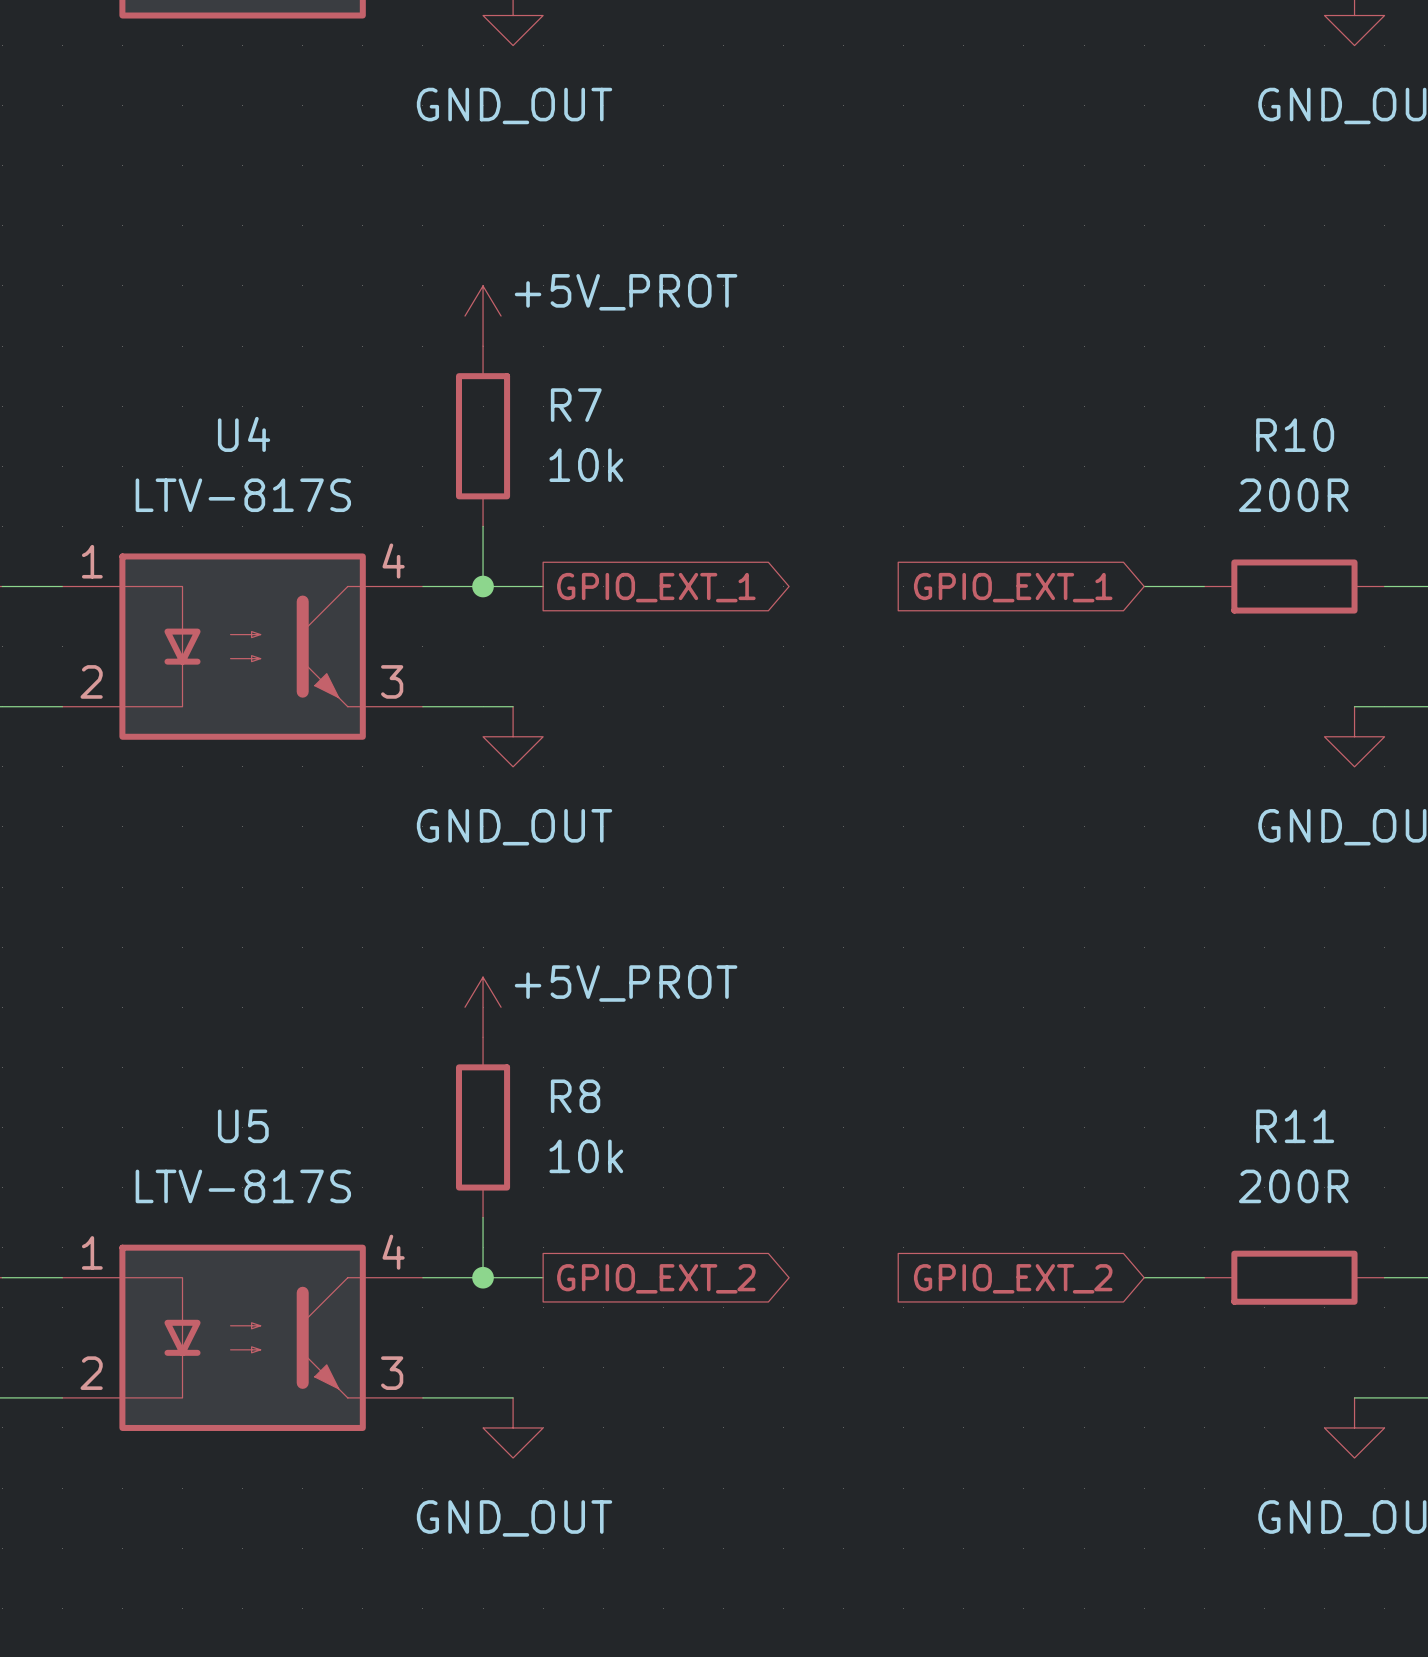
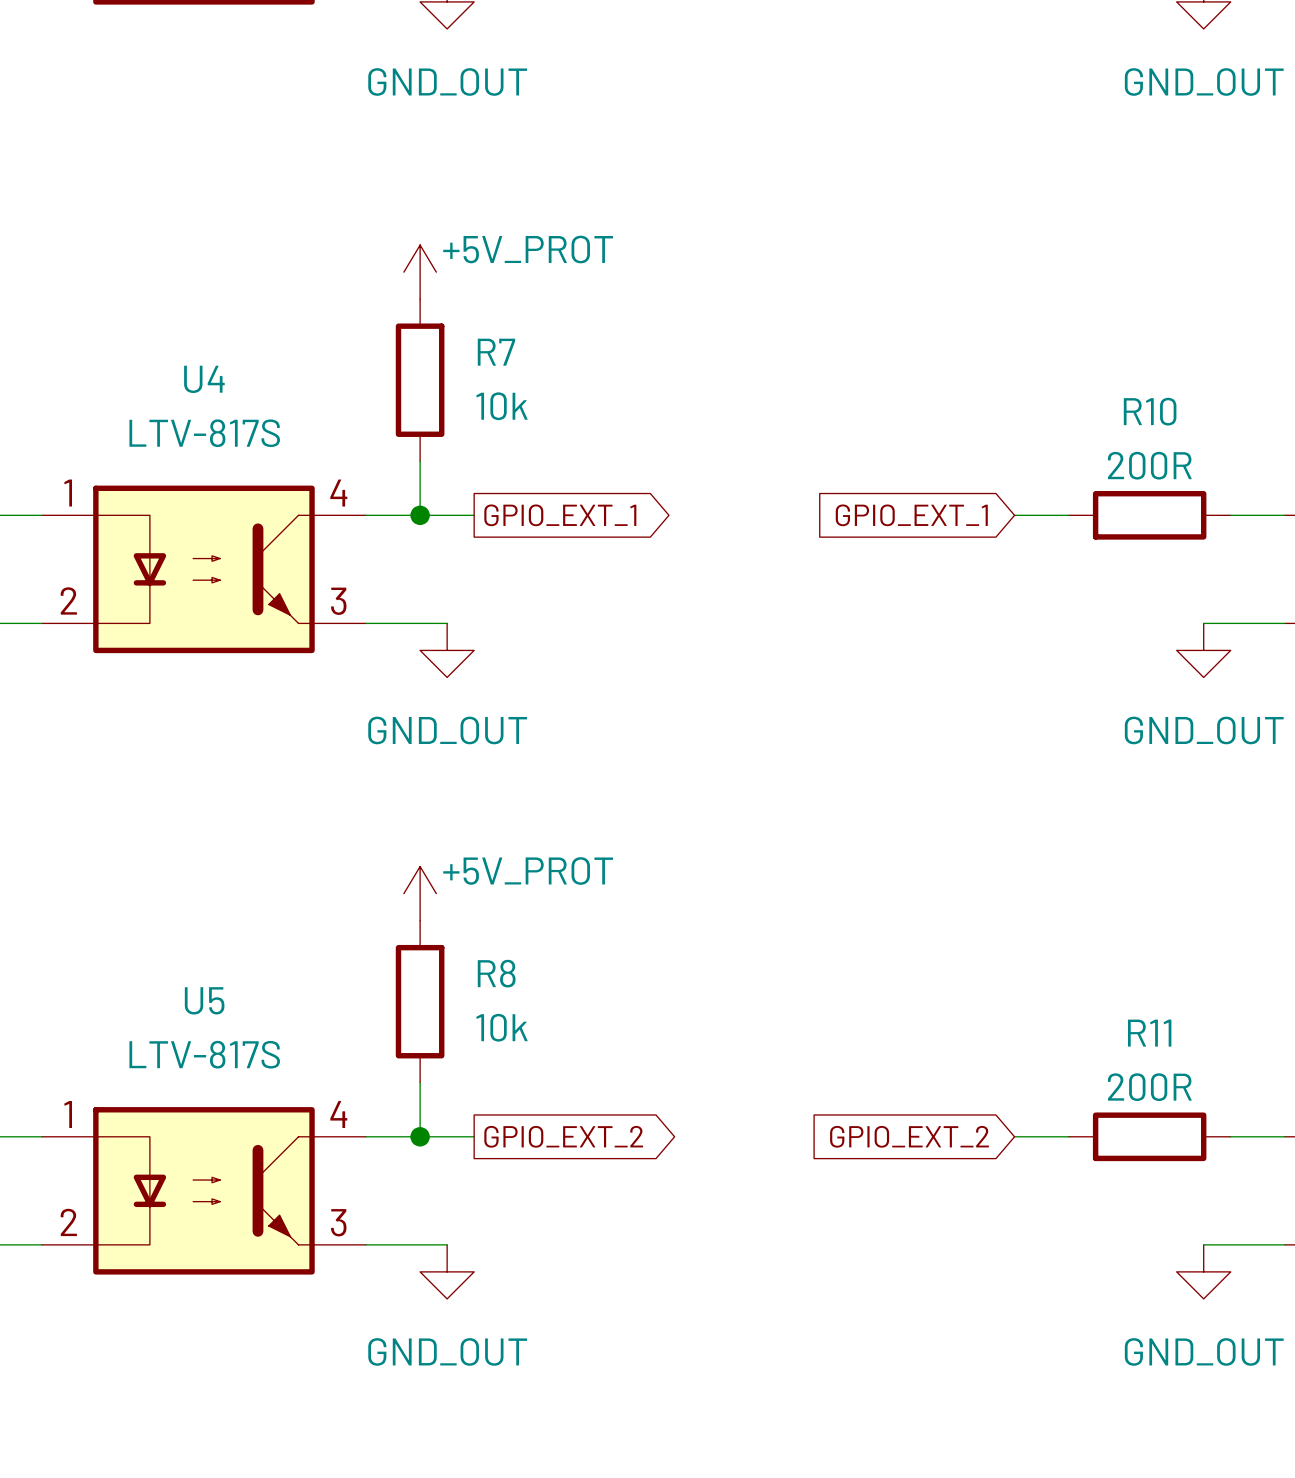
R10 name position: R10 (1295, 435) -> R10 (1150, 411)
R10 value position: 200R (1293, 495) -> 200R (1149, 465)
R11 name position: R11 (1295, 1126) -> R11 (1149, 1033)
R11 value position: 200R (1293, 1186) -> 200R (1149, 1087)

